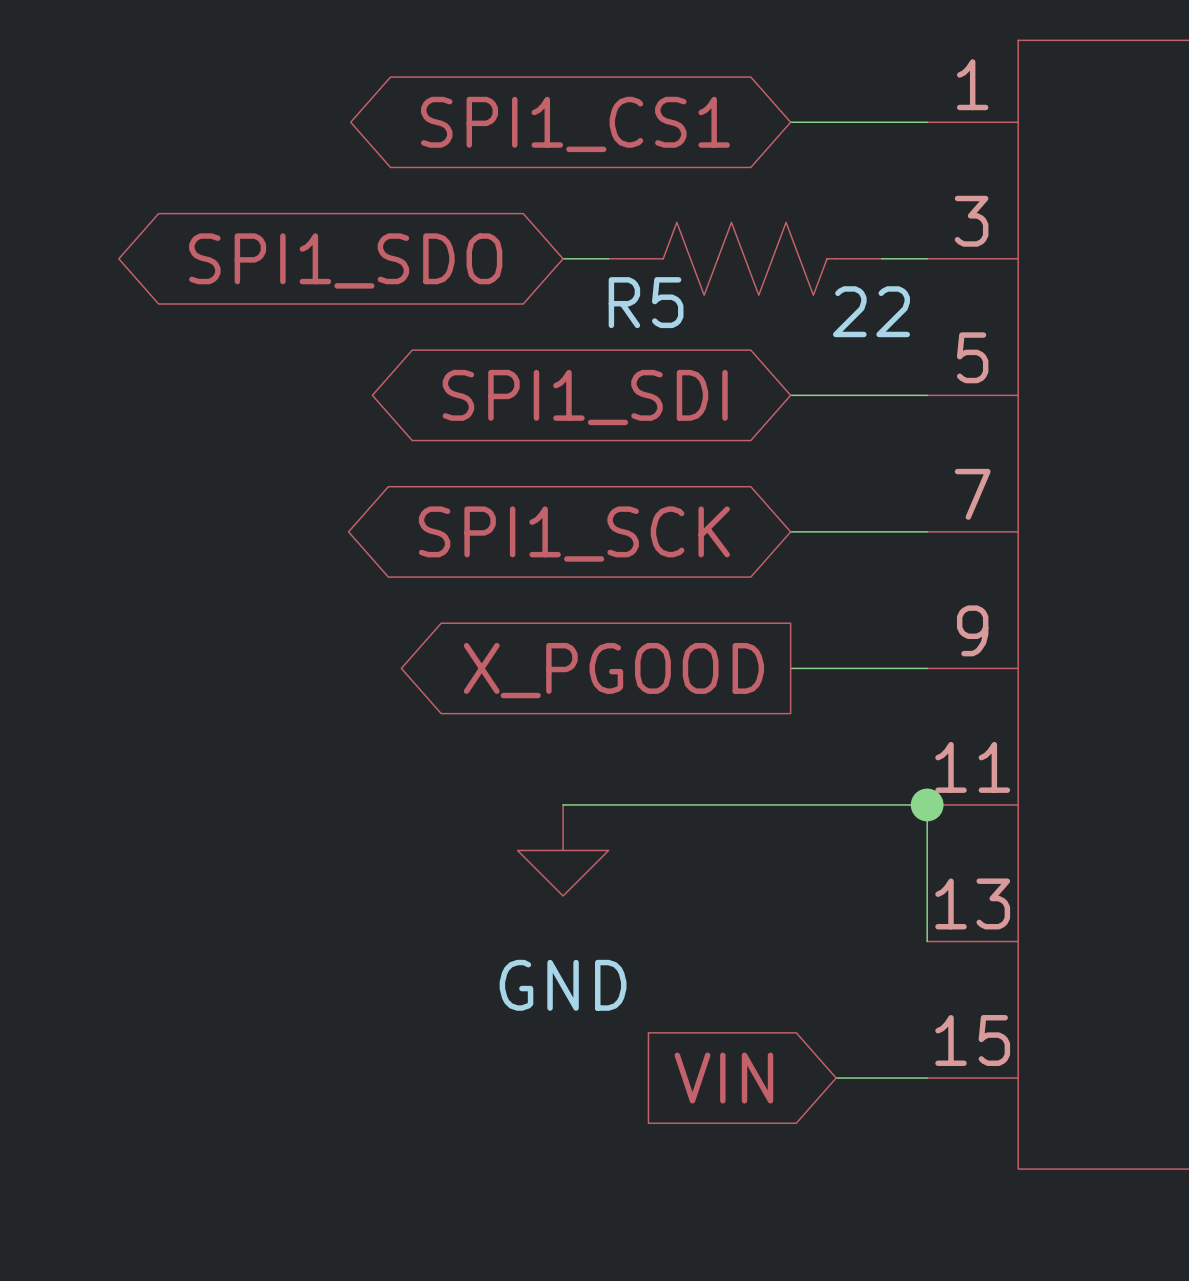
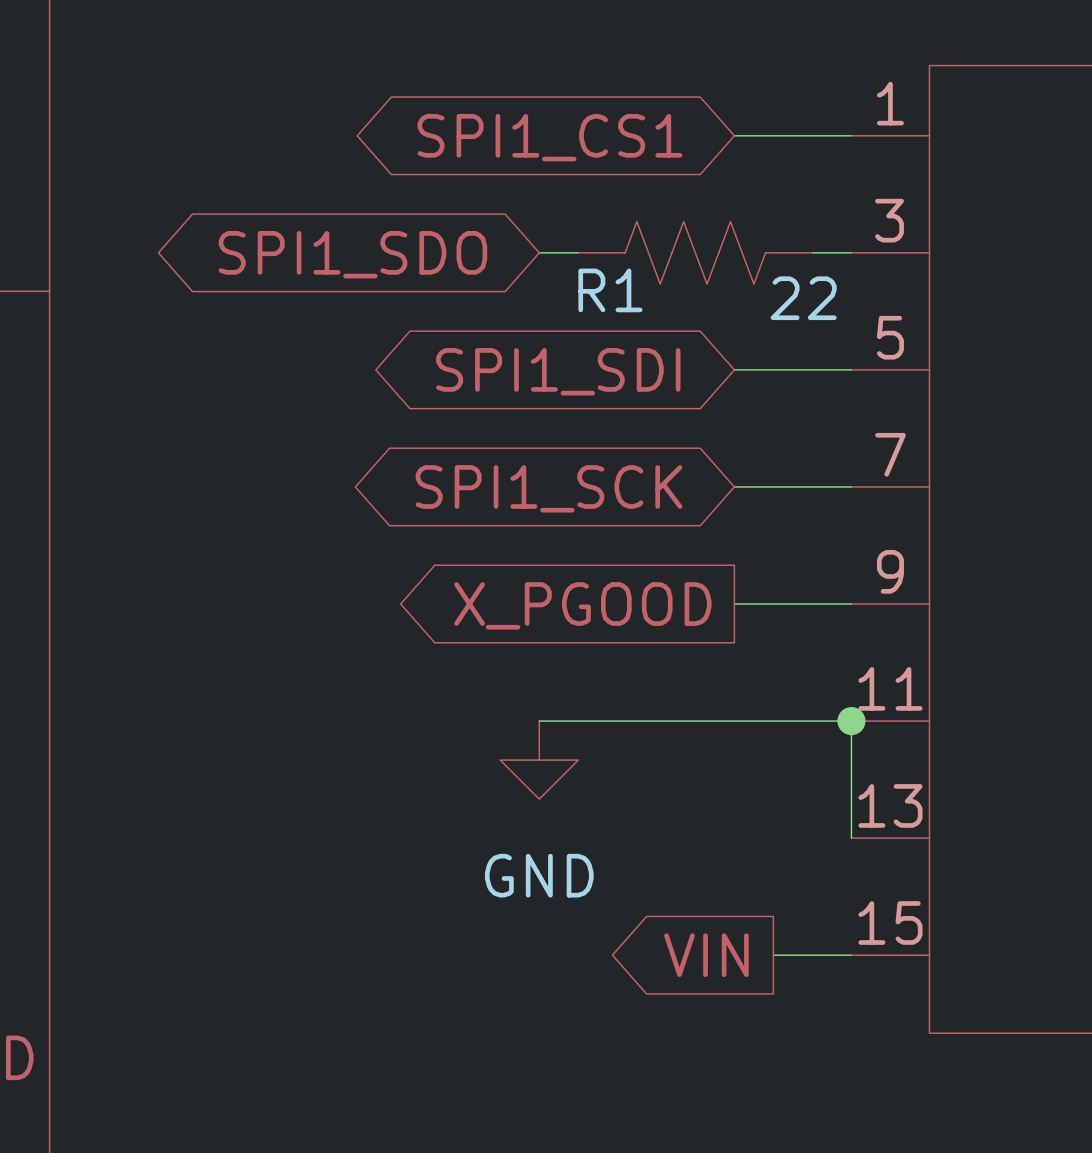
R5 name: R5 (646, 302) -> R1 (610, 290)
global label shape: input (723, 1078) -> output (706, 955)

